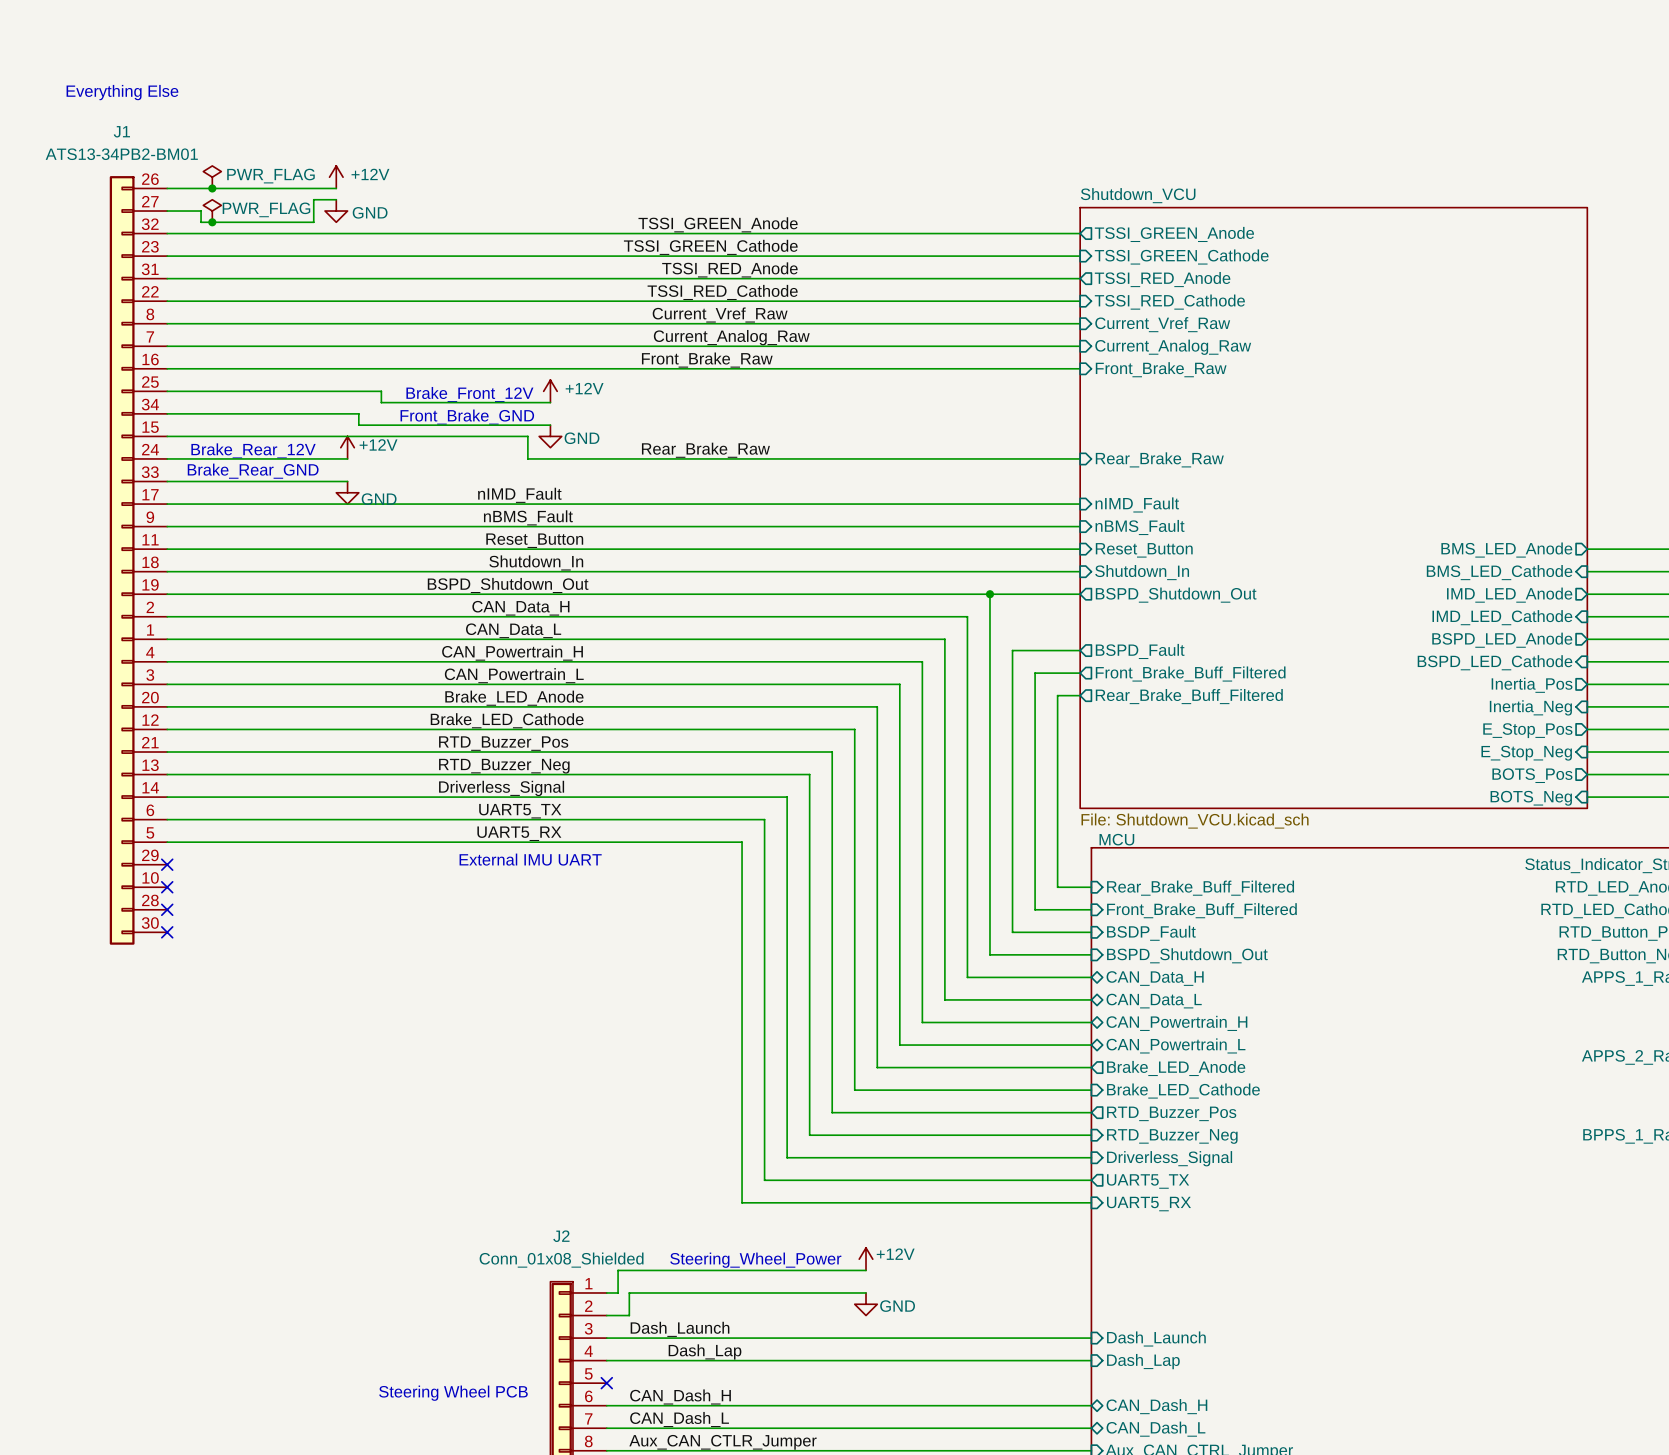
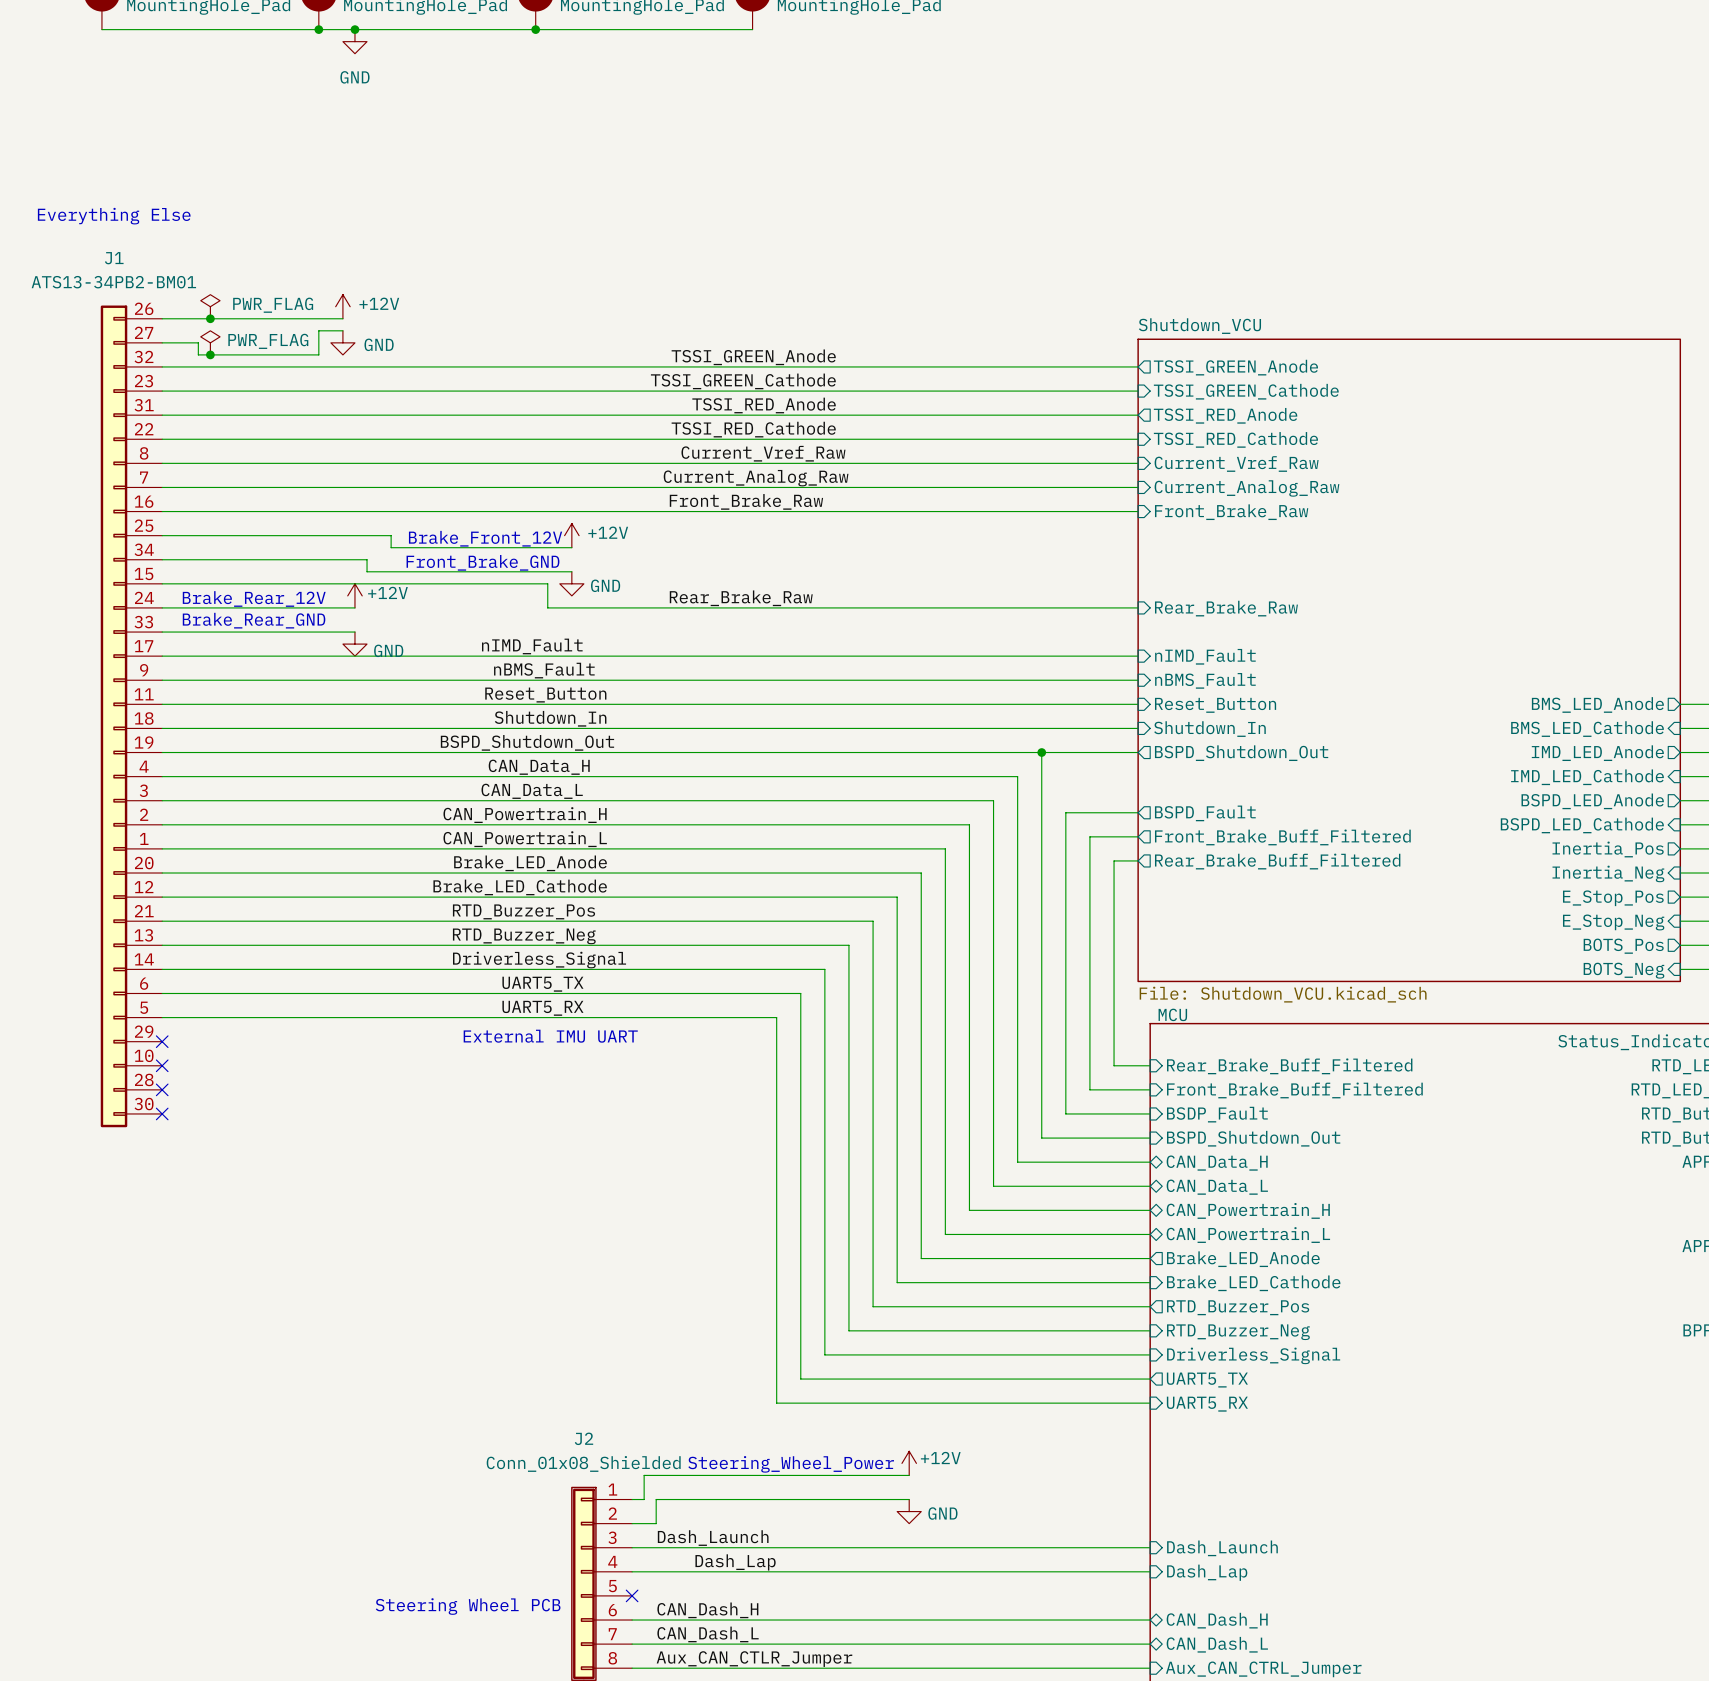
J1 pin number: 2 (150, 607) -> 4 (144, 766)
J1 pin number: 1 (150, 630) -> 3 (143, 790)
J1 pin number: 4 (150, 652) -> 2 (144, 814)
J1 pin number: 3 (150, 675) -> 1 (144, 838)

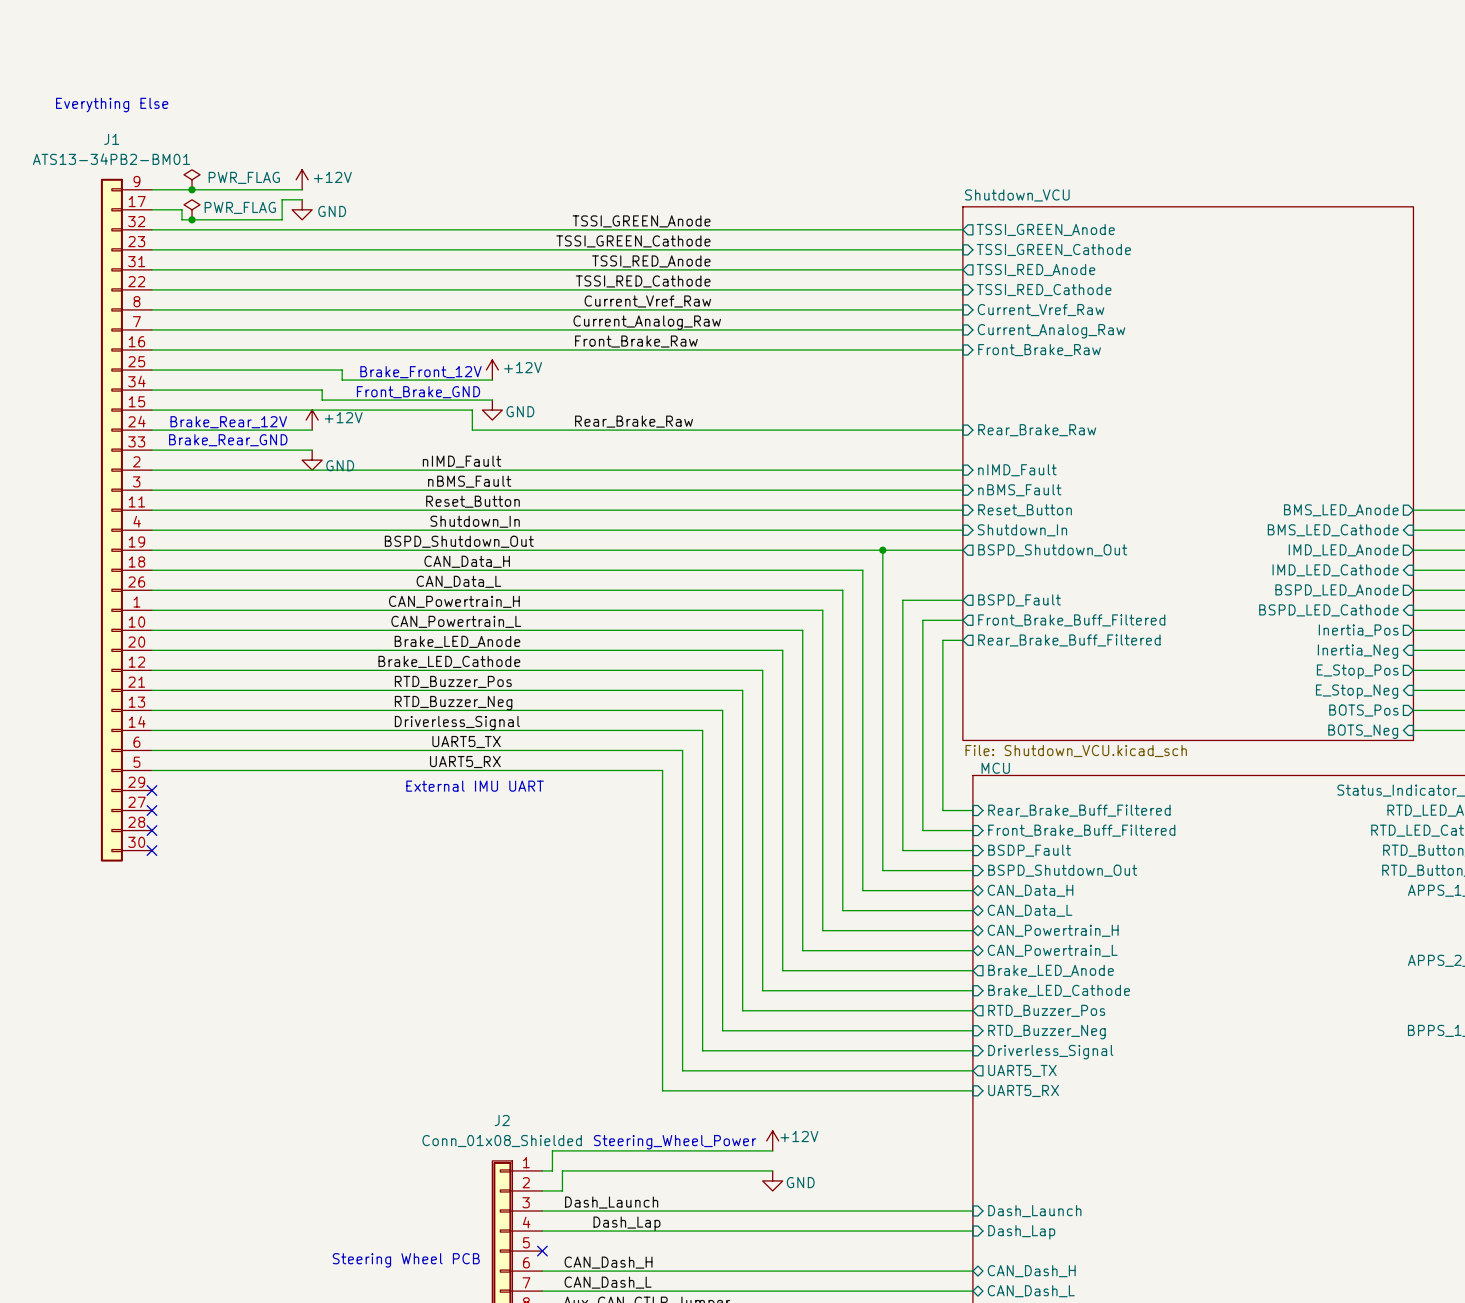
J1 symbol: [100, 305, 163, 1128] -> [100, 178, 152, 862]

